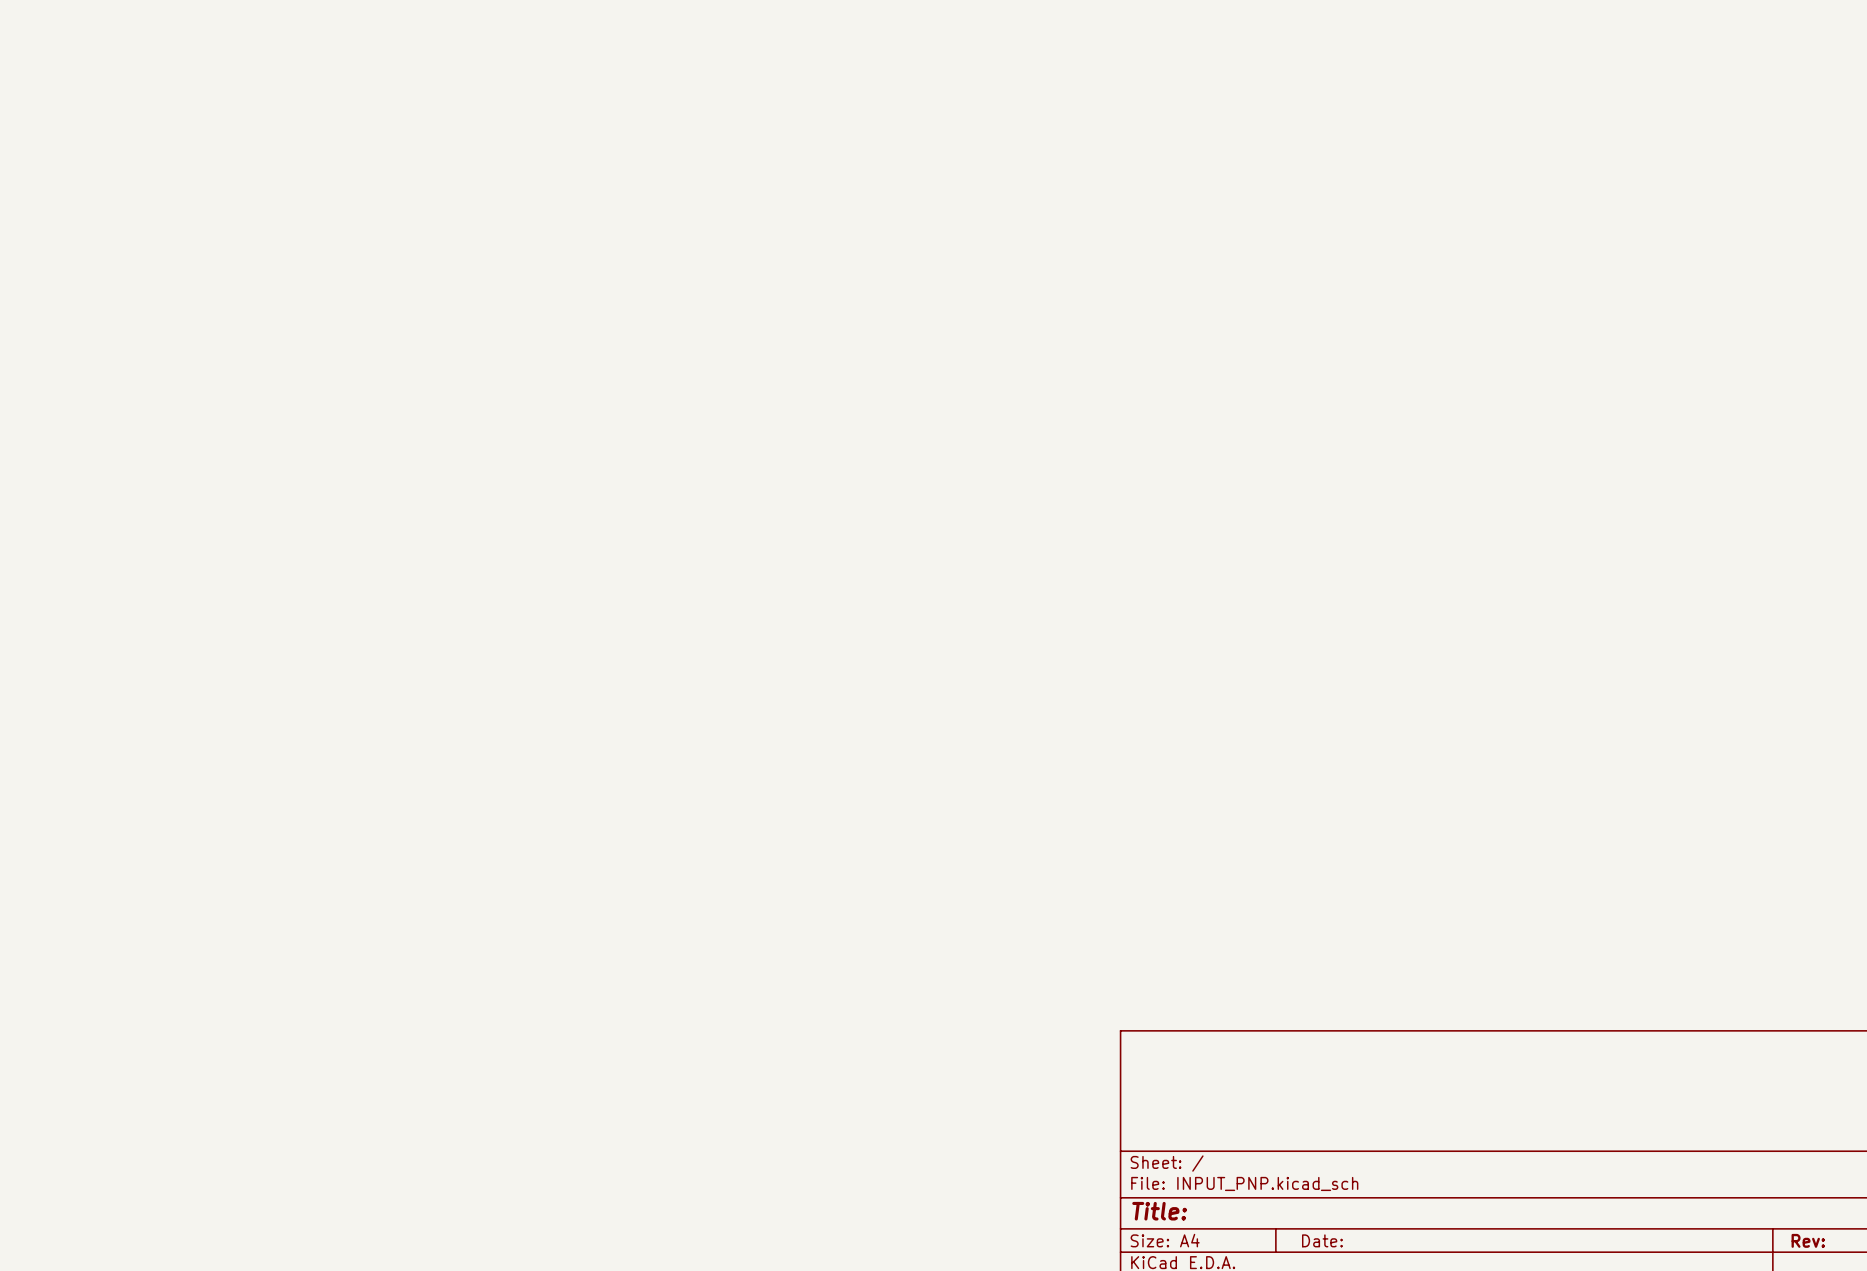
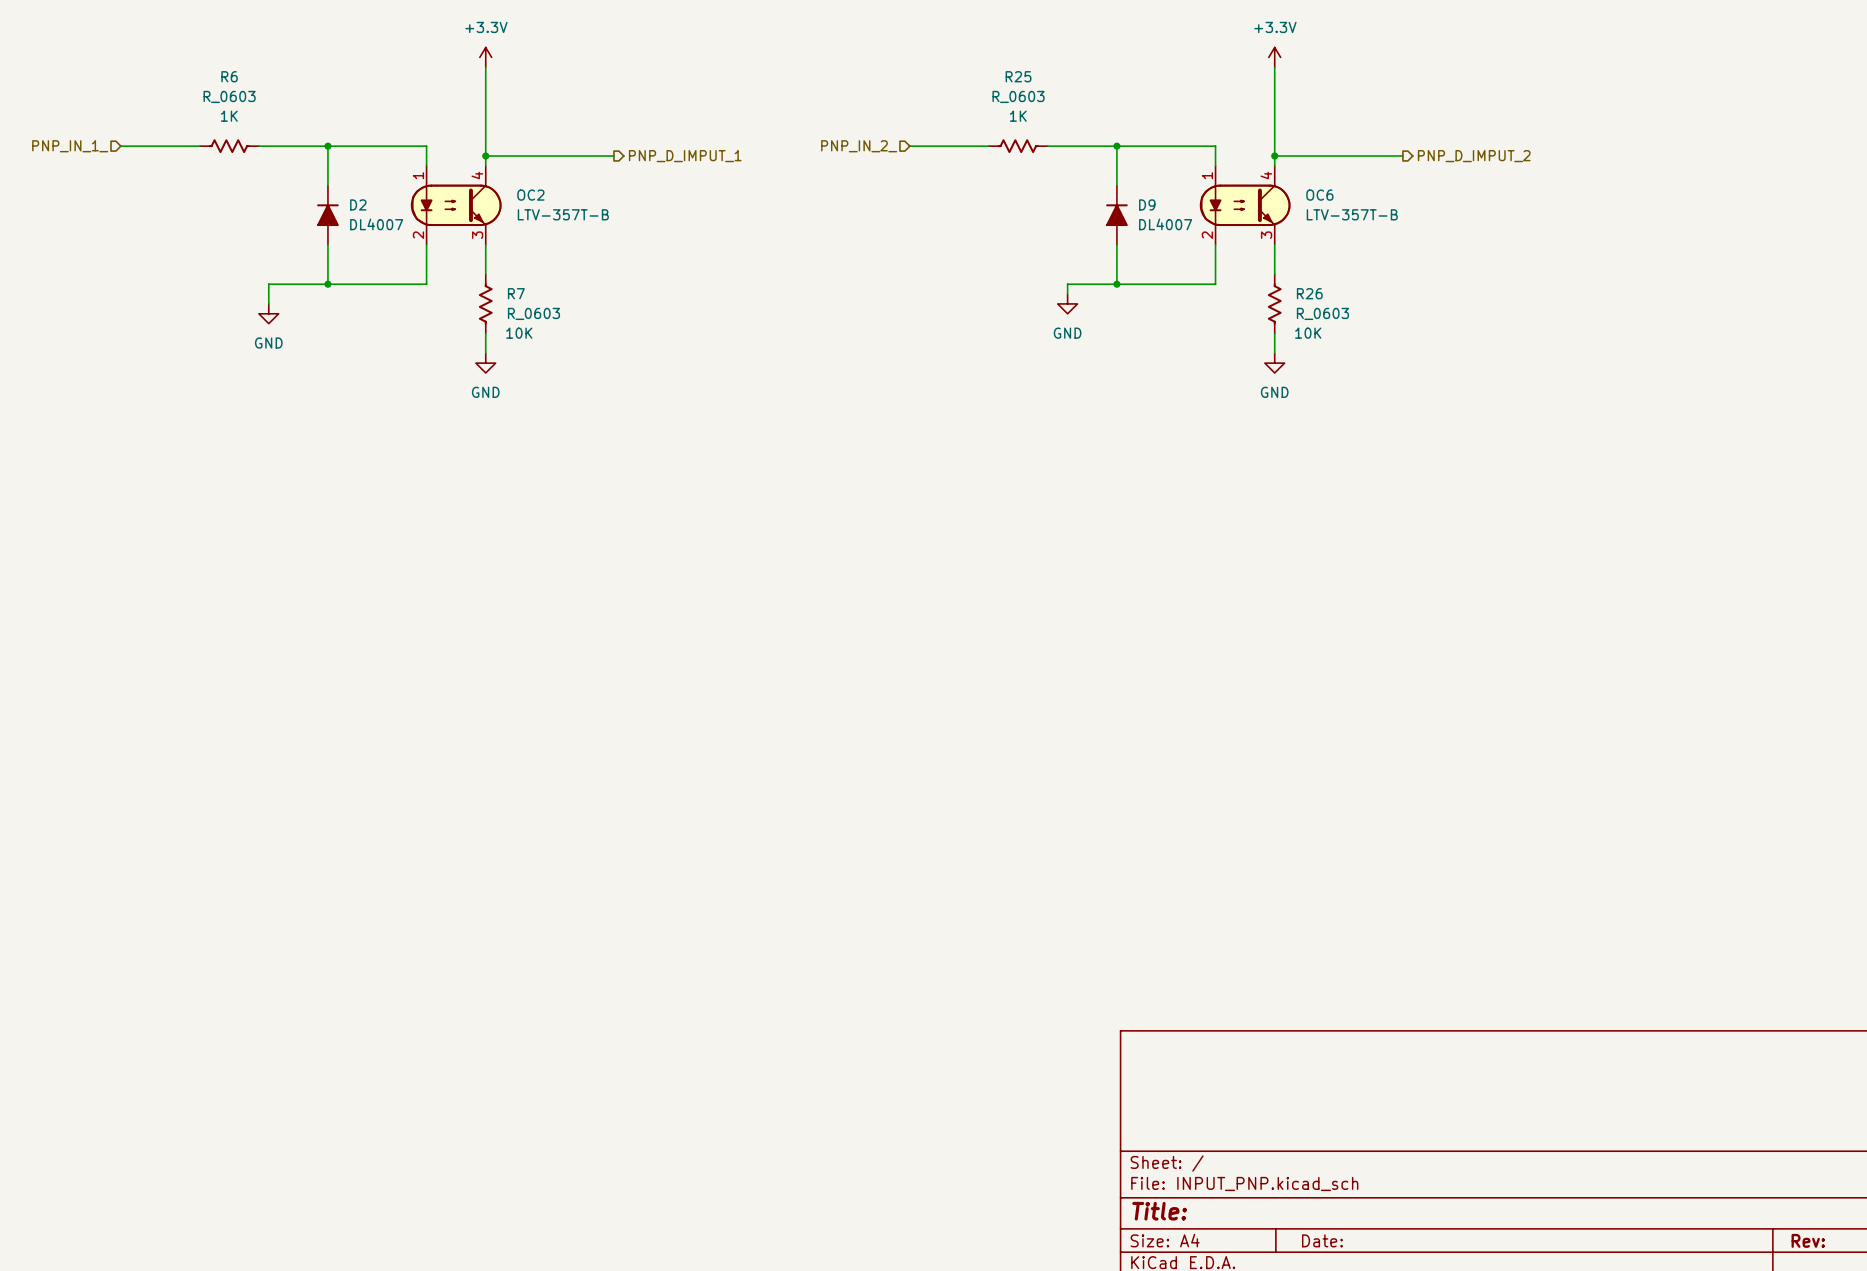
power symbol: none -> +3.3V (485, 57)
power symbol: none -> +3.3V (1274, 57)
wire: none -> (485, 67) (485, 165)
wire: none -> (1274, 67) (1274, 165)
hierarchical label: none -> PNP_IN_1_ (70, 146)
wire: none -> (120, 146) (199, 146)
R6: none -> R_0603 (229, 146)
wire: none -> (258, 146) (426, 146) (426, 165)
wire: none -> (327, 146) (327, 185)
junction: none -> (327, 146)
hierarchical label: none -> PNP_IN_2_ (859, 146)
wire: none -> (909, 146) (988, 146)
R25: none -> R_0603 (1018, 146)
wire: none -> (1047, 146) (1215, 146) (1215, 165)
wire: none -> (1116, 146) (1116, 185)
junction: none -> (1116, 146)
wire: none -> (485, 156) (613, 156)
junction: none -> (485, 156)
hierarchical label: none -> PNP_D_IMPUT_1 (685, 156)
wire: none -> (1274, 156) (1402, 156)
junction: none -> (1274, 156)
hierarchical label: none -> PNP_D_IMPUT_2 (1474, 156)
OC2: none -> LTV-357T-B (456, 205)
OC6: none -> LTV-357T-B (1245, 205)
D2: none -> DL4007 (327, 215)
D9: none -> DL4007 (1116, 215)
wire: none -> (327, 244) (327, 284)
wire: none -> (426, 244) (426, 284) (268, 284) (268, 303)
wire: none -> (485, 244) (485, 274)
wire: none -> (1116, 244) (1116, 284)
wire: none -> (1215, 244) (1215, 284) (1067, 284) (1067, 294)
wire: none -> (1274, 244) (1274, 274)
junction: none -> (327, 284)
junction: none -> (1116, 284)
R7: none -> R_0603 (485, 303)
power symbol: none -> GND (1067, 303)
R26: none -> R_0603 (1274, 303)
power symbol: none -> GND (268, 313)
wire: none -> (485, 333) (485, 353)
wire: none -> (1274, 333) (1274, 353)
power symbol: none -> GND (485, 363)
power symbol: none -> GND (1274, 363)

